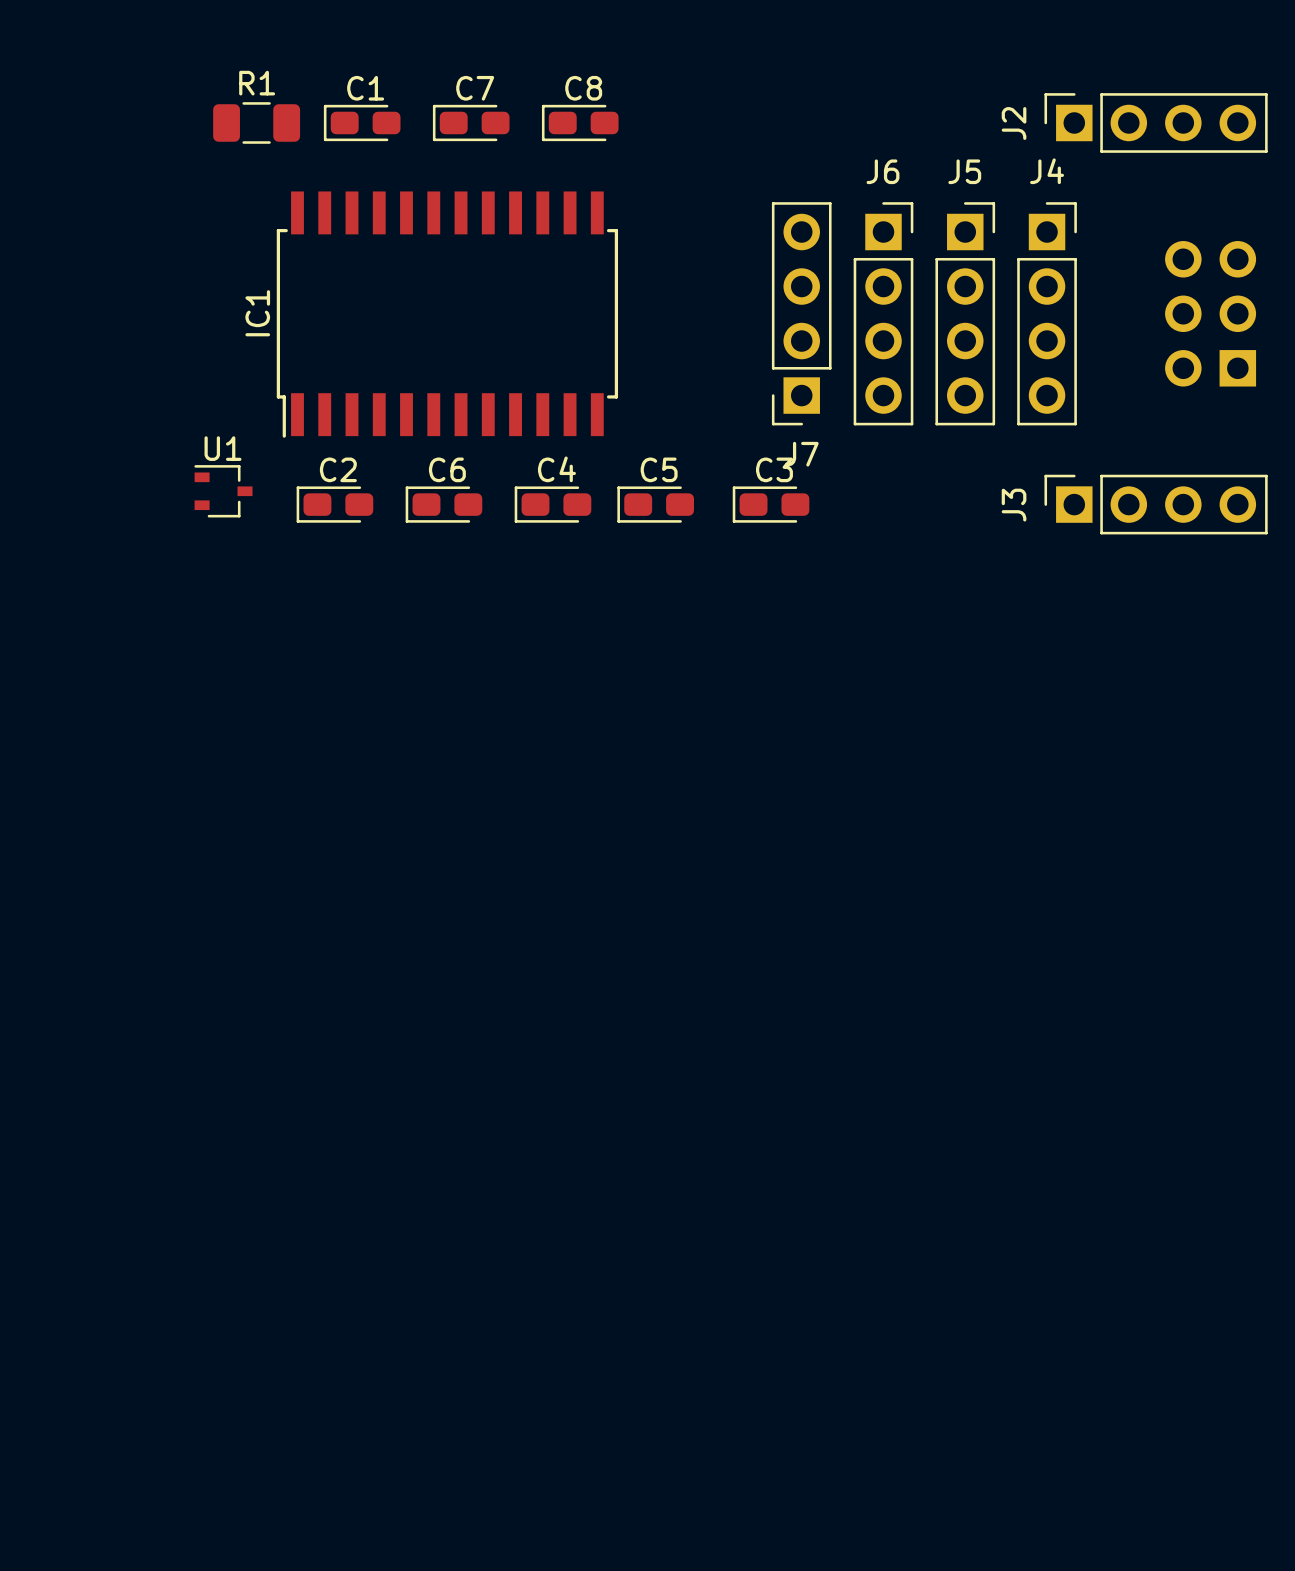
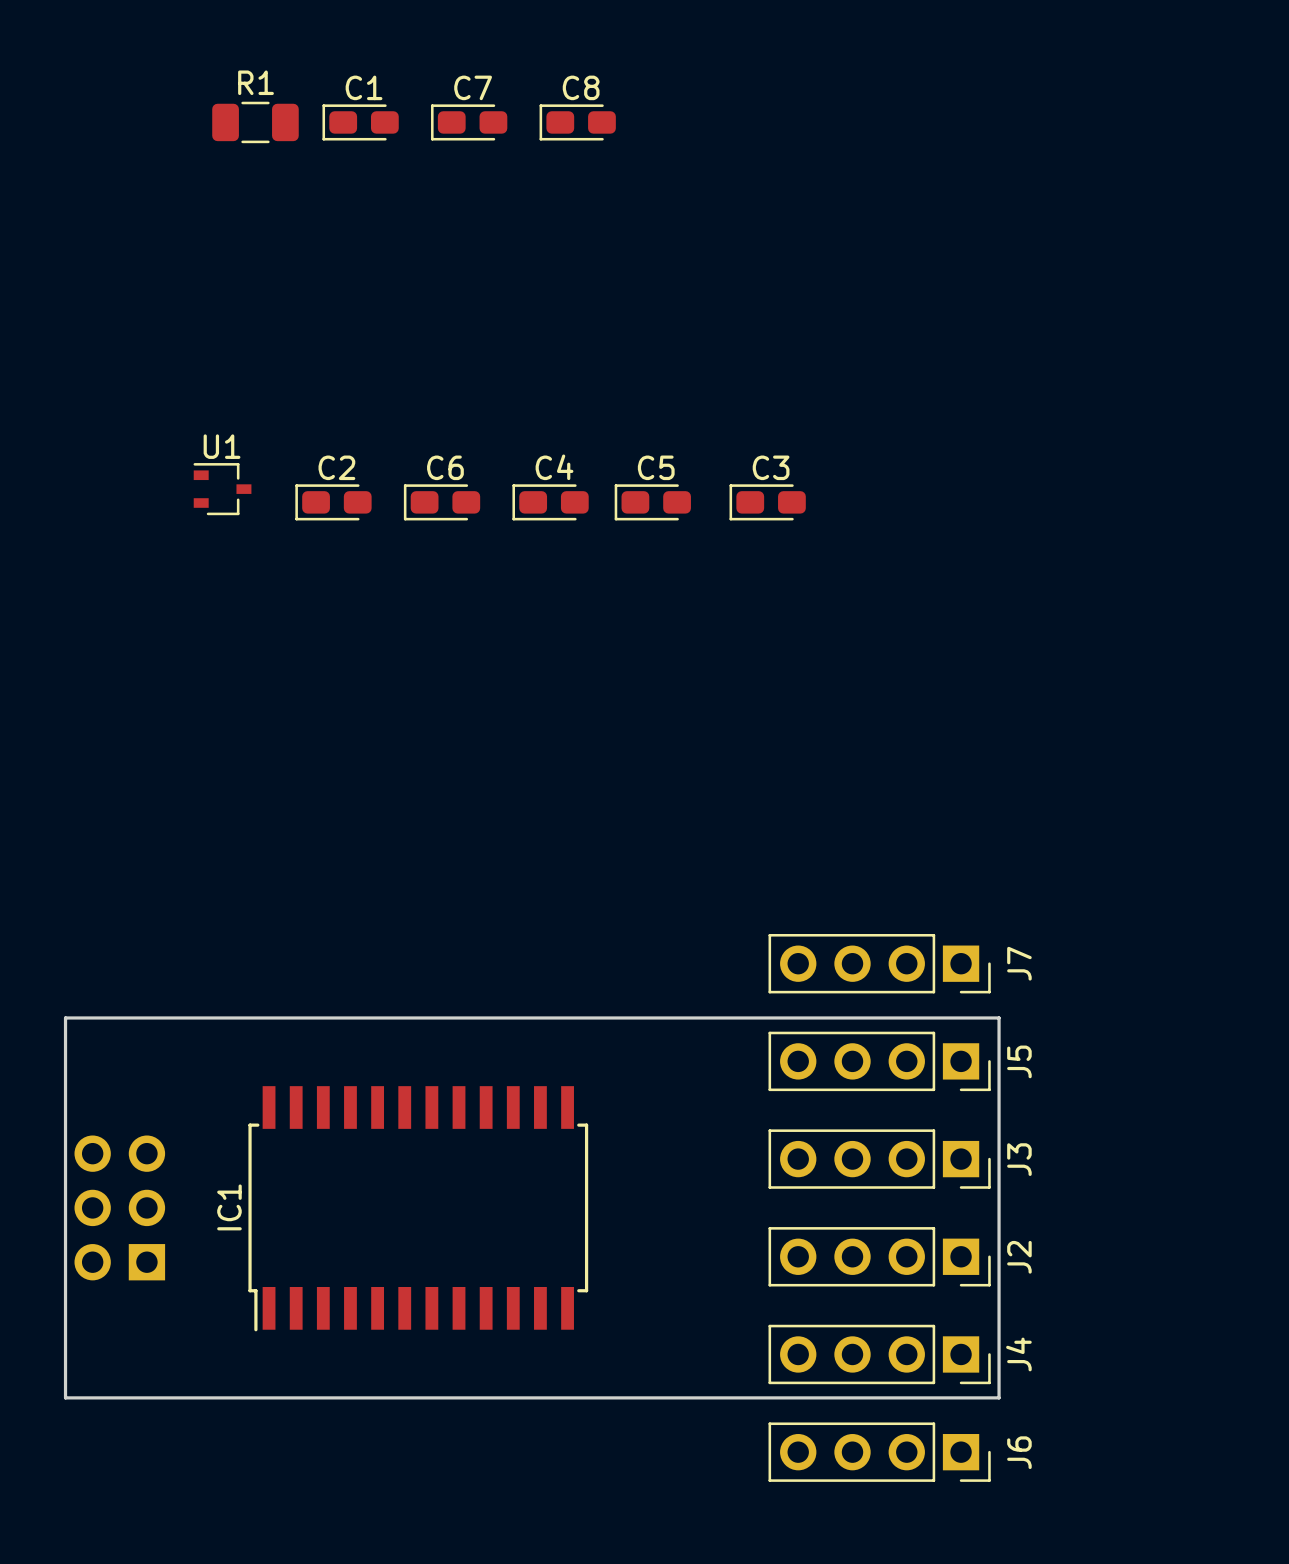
J2 rotation: 0° (1156, 122) -> 180° (879, 1256)
J2 position: (1156, 122) -> (879, 1256)
J7 rotation: 0° (801, 313) -> 90° counterclockwise (879, 963)
J7 position: (801, 313) -> (879, 963)
J6 rotation: 0° (883, 313) -> 90° clockwise (879, 1452)
J6 position: (883, 313) -> (879, 1452)
J5 rotation: 0° (965, 313) -> 90° clockwise (879, 1061)
J5 position: (965, 313) -> (879, 1061)
J4 rotation: 0° (1047, 313) -> 90° clockwise (879, 1354)
J4 position: (1047, 313) -> (879, 1354)
part: (1210, 313) -> none
IC1 position: (447, 314) -> (418, 1208)
J3 rotation: 0° (1156, 504) -> 180° (879, 1159)
J3 position: (1156, 504) -> (879, 1159)
board edge: none -> (65, 1017) (999, 1017) (999, 1397) (65, 1397) (65, 1017)
part: none -> (119, 1207)

